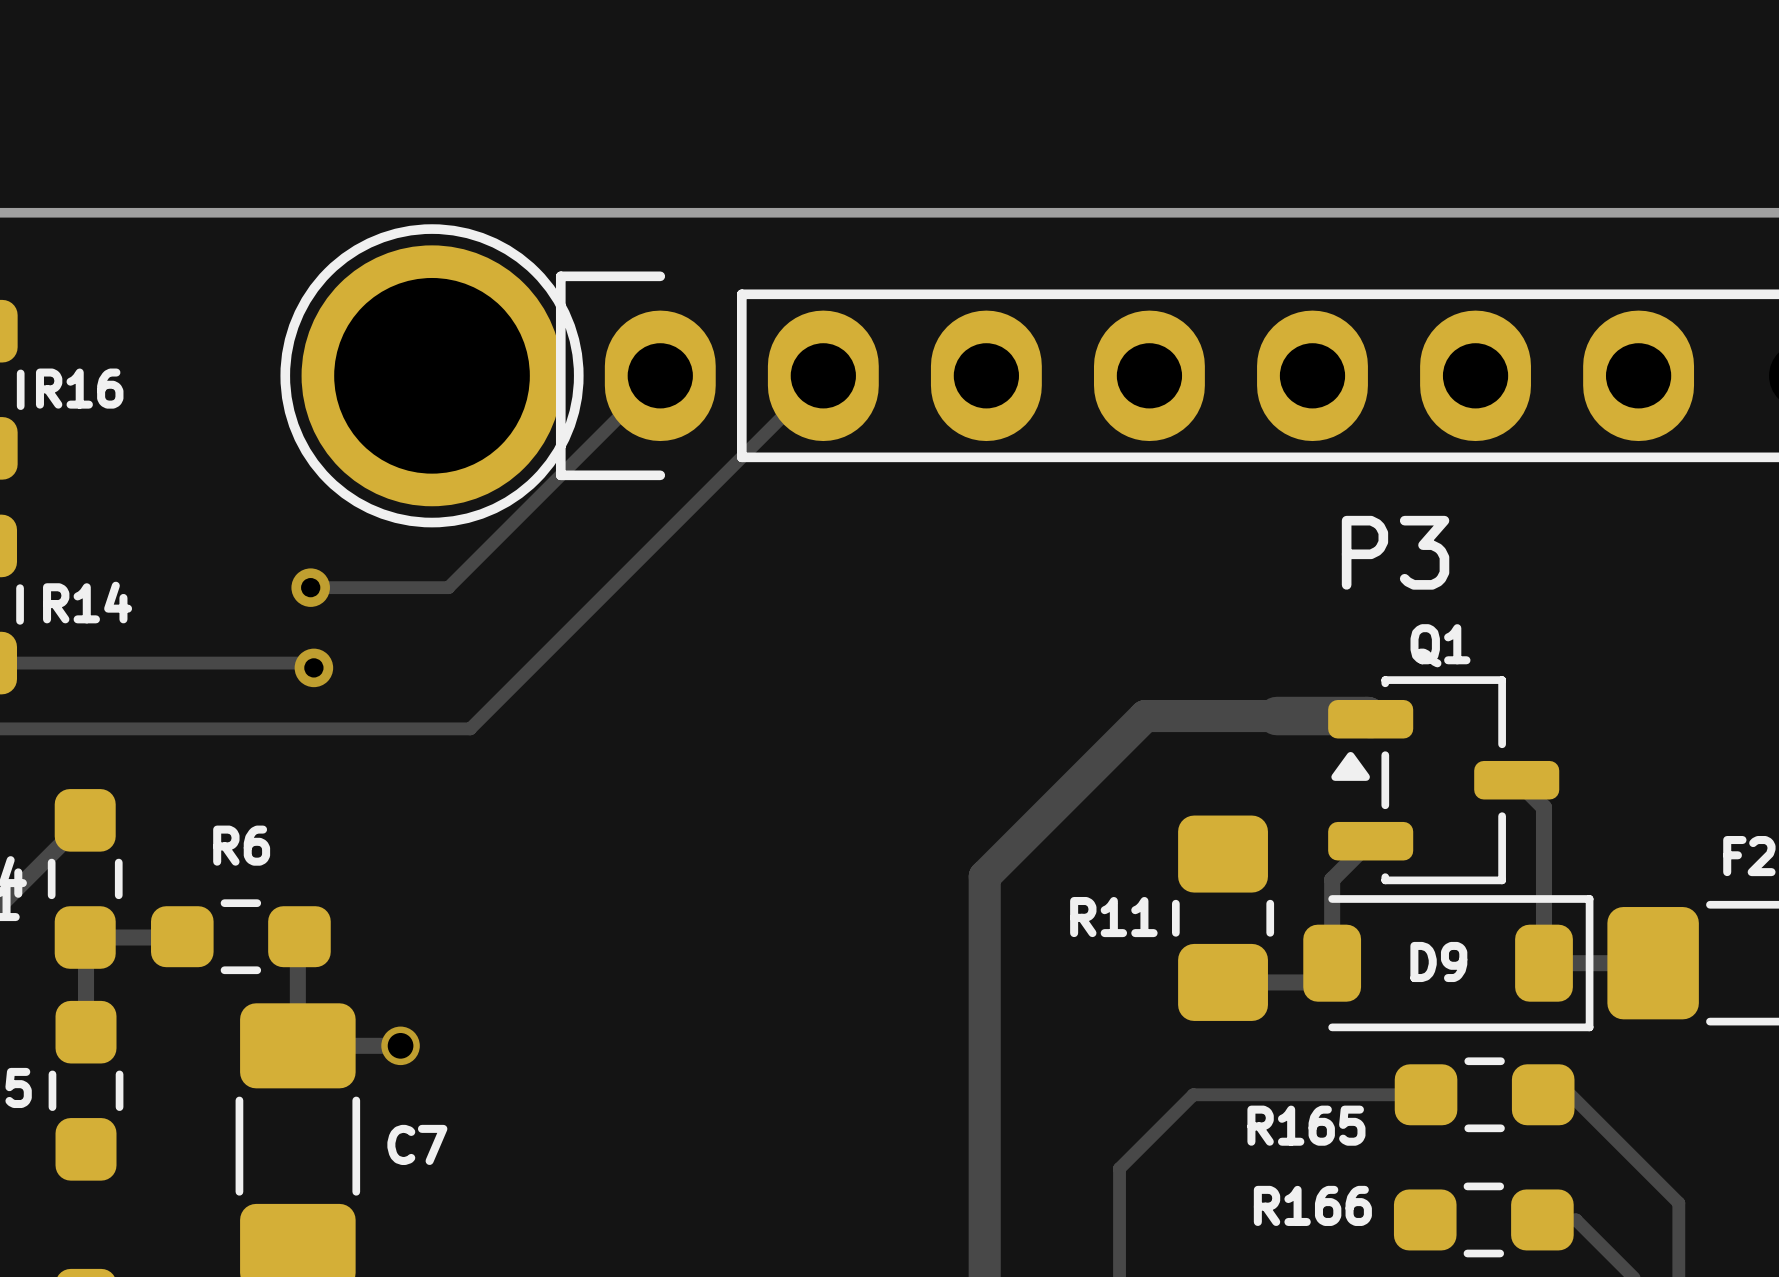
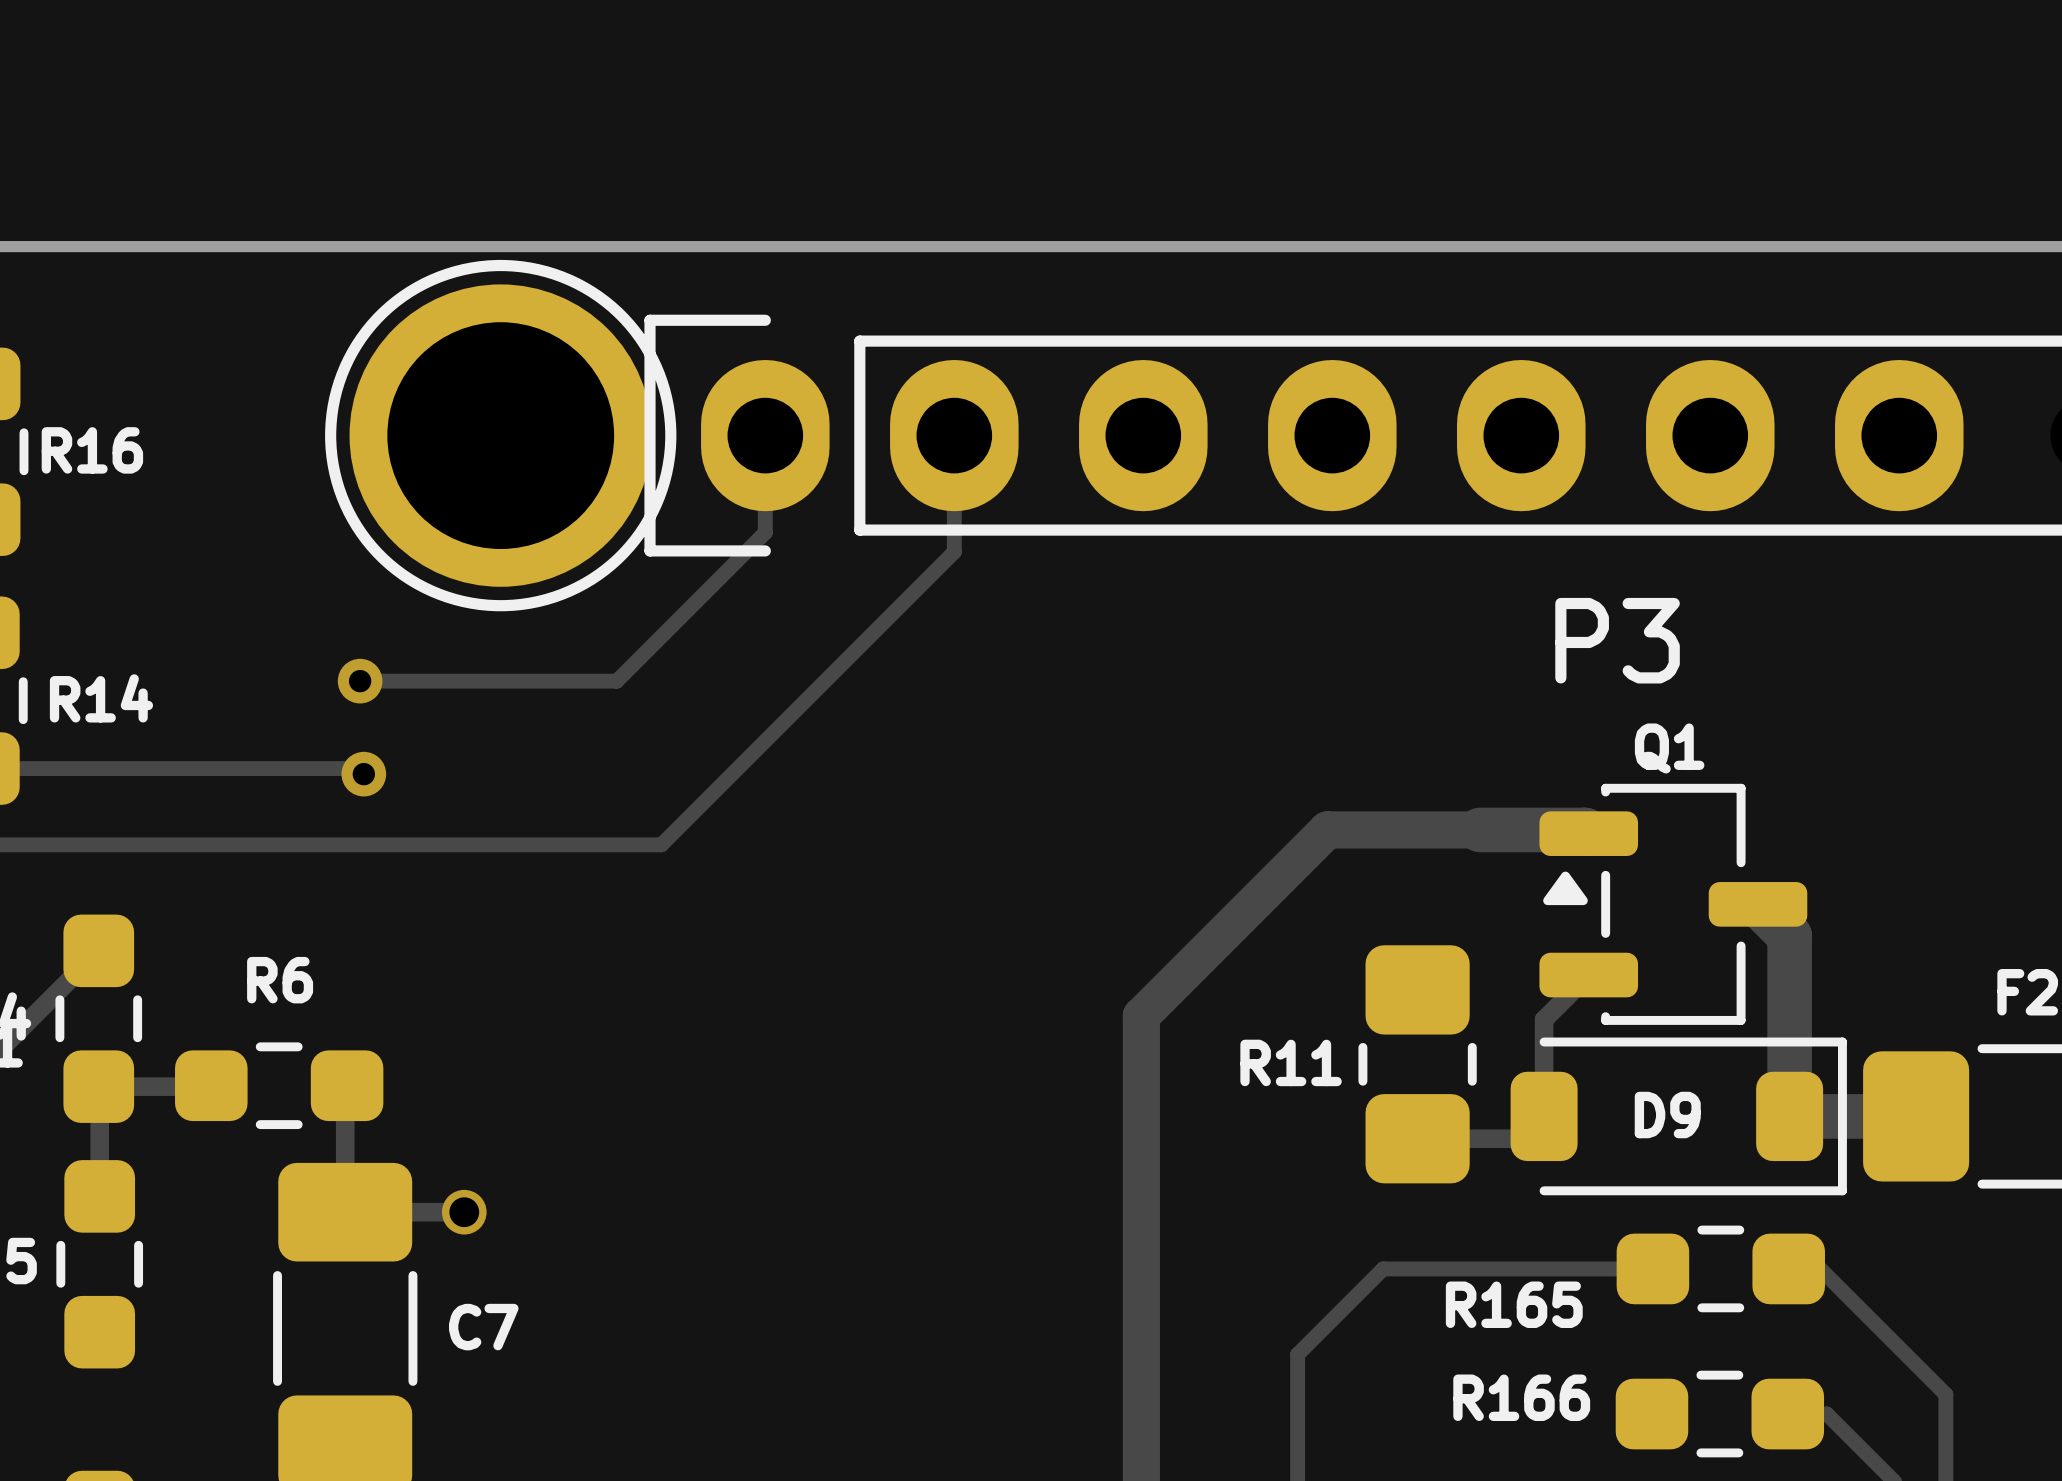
track: (660, 375) (448, 587) -> (765, 435) (765, 532) (616, 681) (519, 681)
track: (823, 375) (470, 728) -> (954, 477) (954, 551) (661, 844) (545, 844)
track width: thin (1516, 780) (1544, 807) (1544, 963) (1653, 963) -> thick (1758, 904) (1789, 935) (1789, 1116) (1916, 1116)

